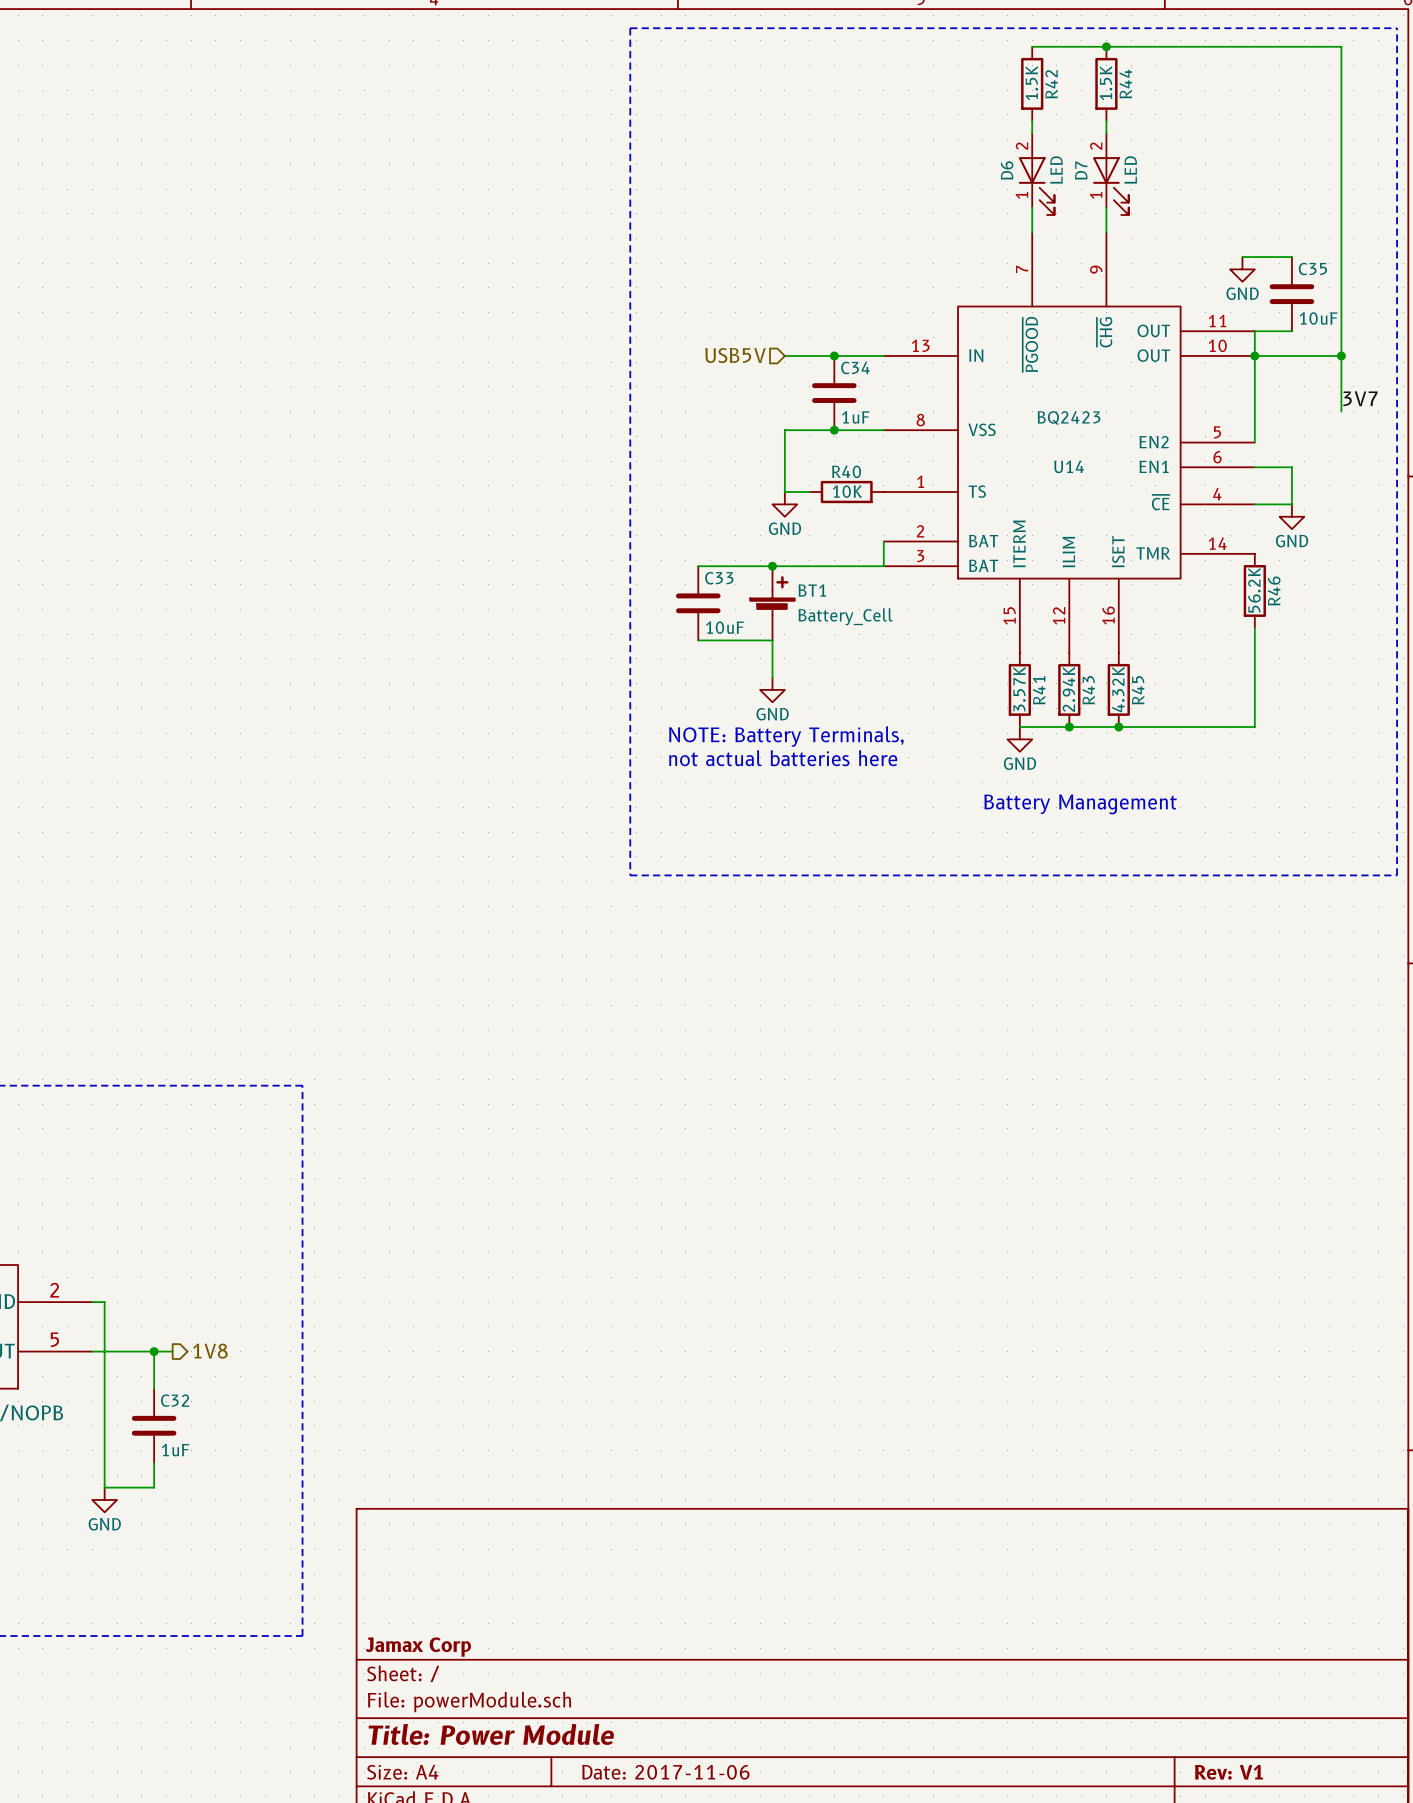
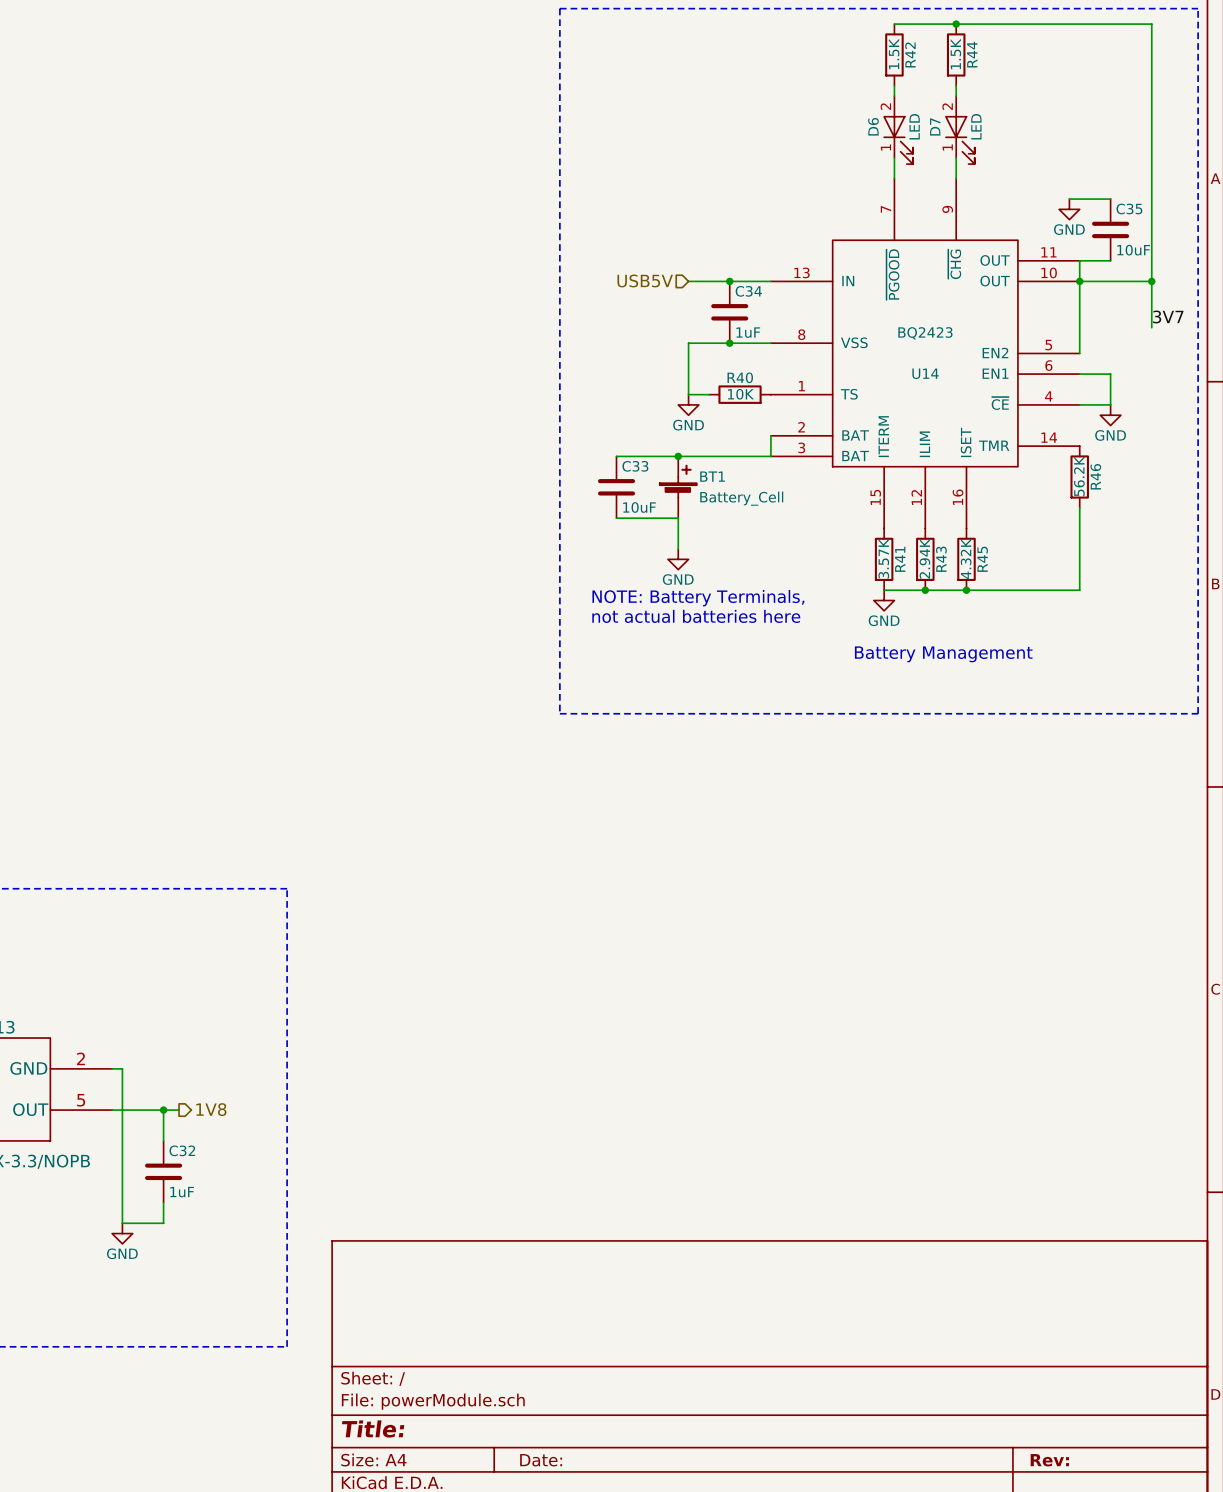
title block: Jamax Corp (418, 1647) -> none
title block: Title: Power Module (491, 1734) -> Title: (373, 1428)
title block: Date: 2017-11-06 (665, 1772) -> Date: (541, 1460)
title block: Rev: V1 (1228, 1772) -> Rev: (1049, 1460)

